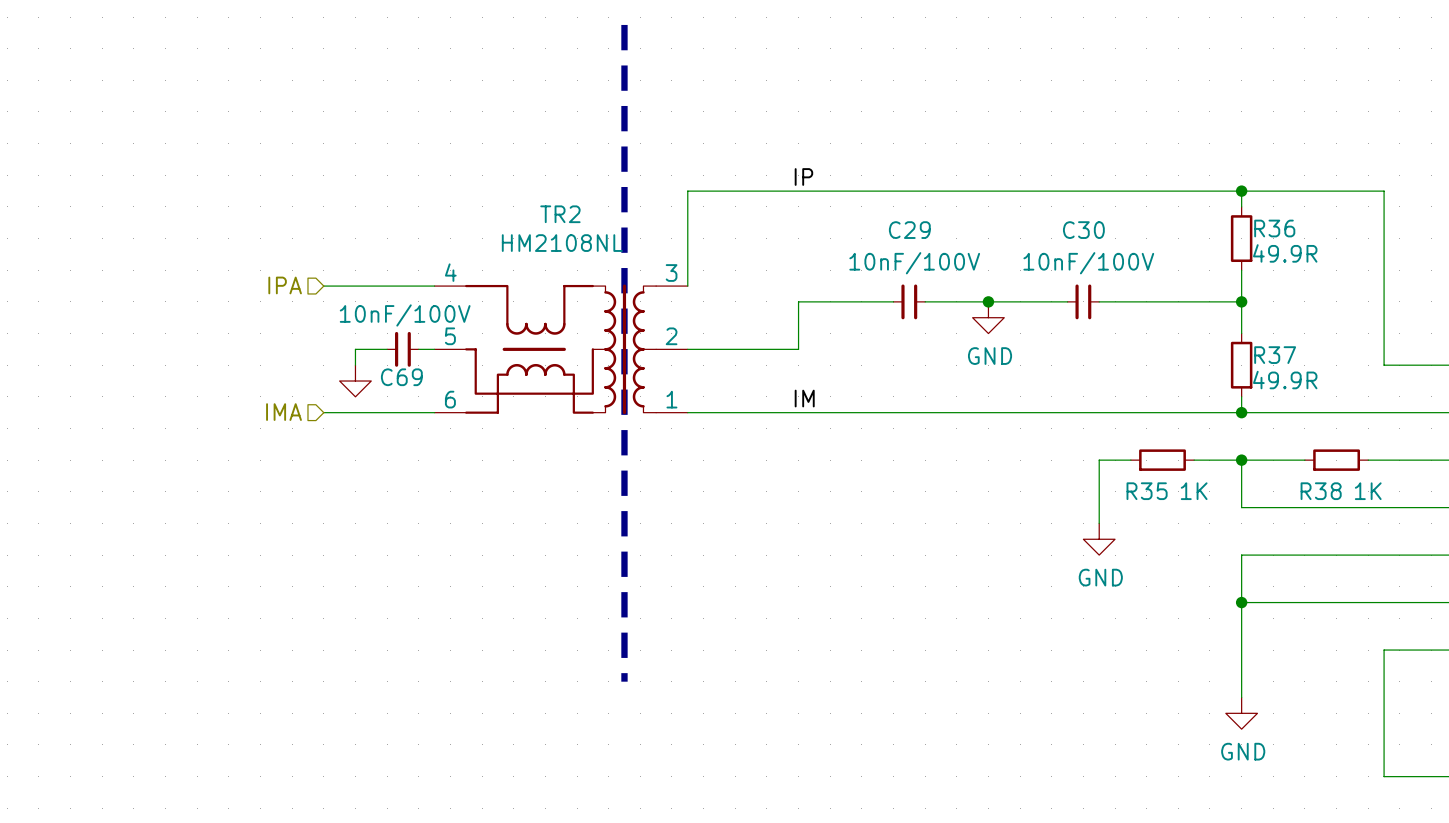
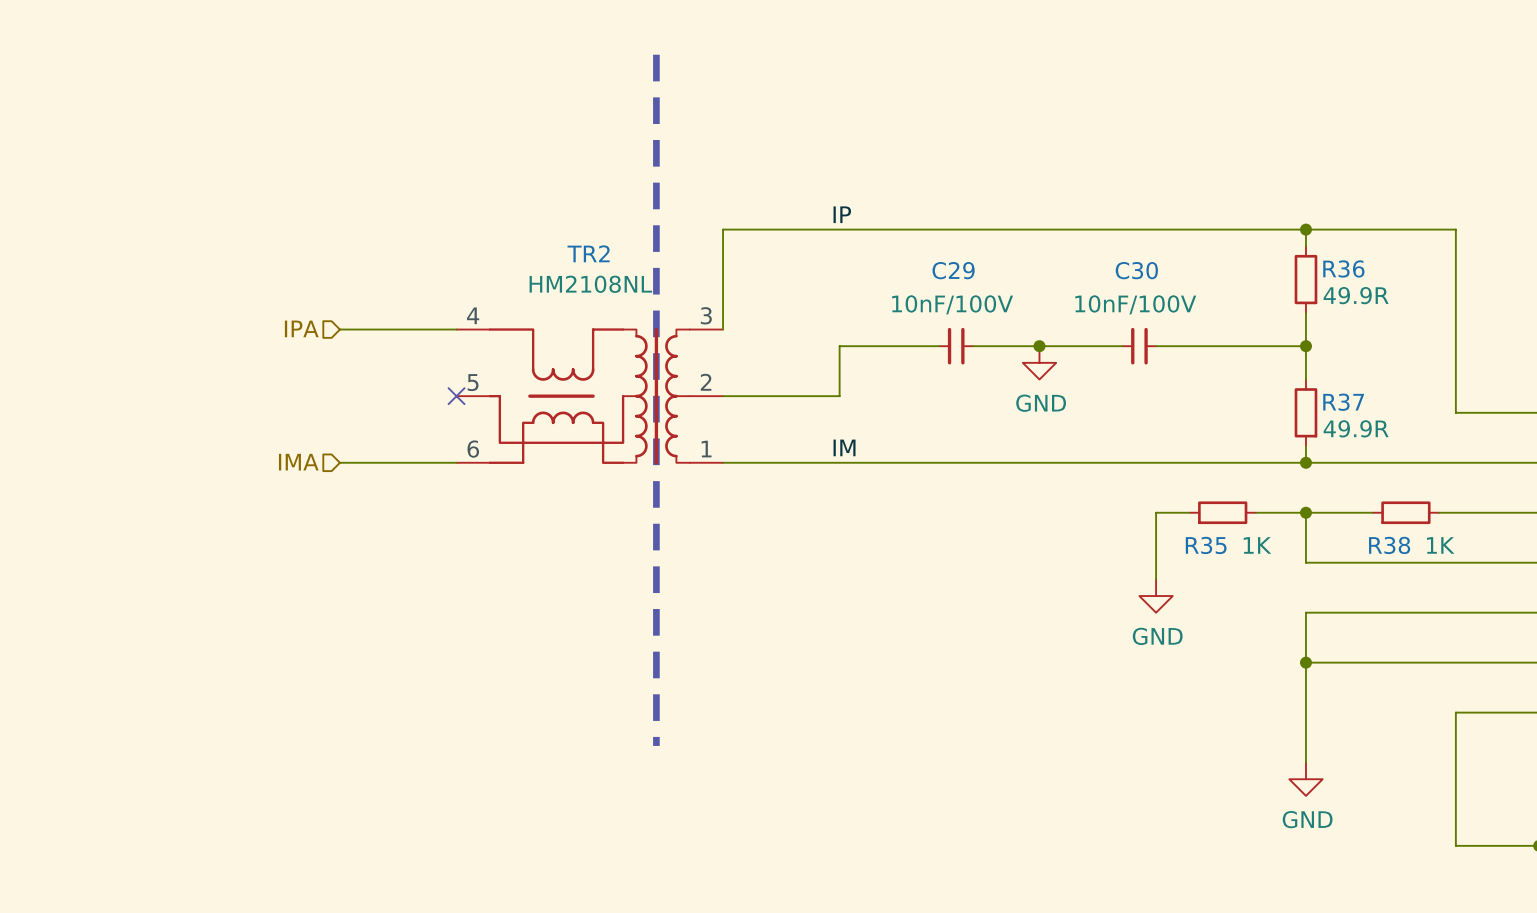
wire: (387, 349) (355, 349) (355, 365) -> none
C69: 10nF/100V (402, 349) -> none
wire: (418, 349) (434, 349) -> none
no-connect mark: none -> (456, 396)
power symbol: (355, 381) -> none

